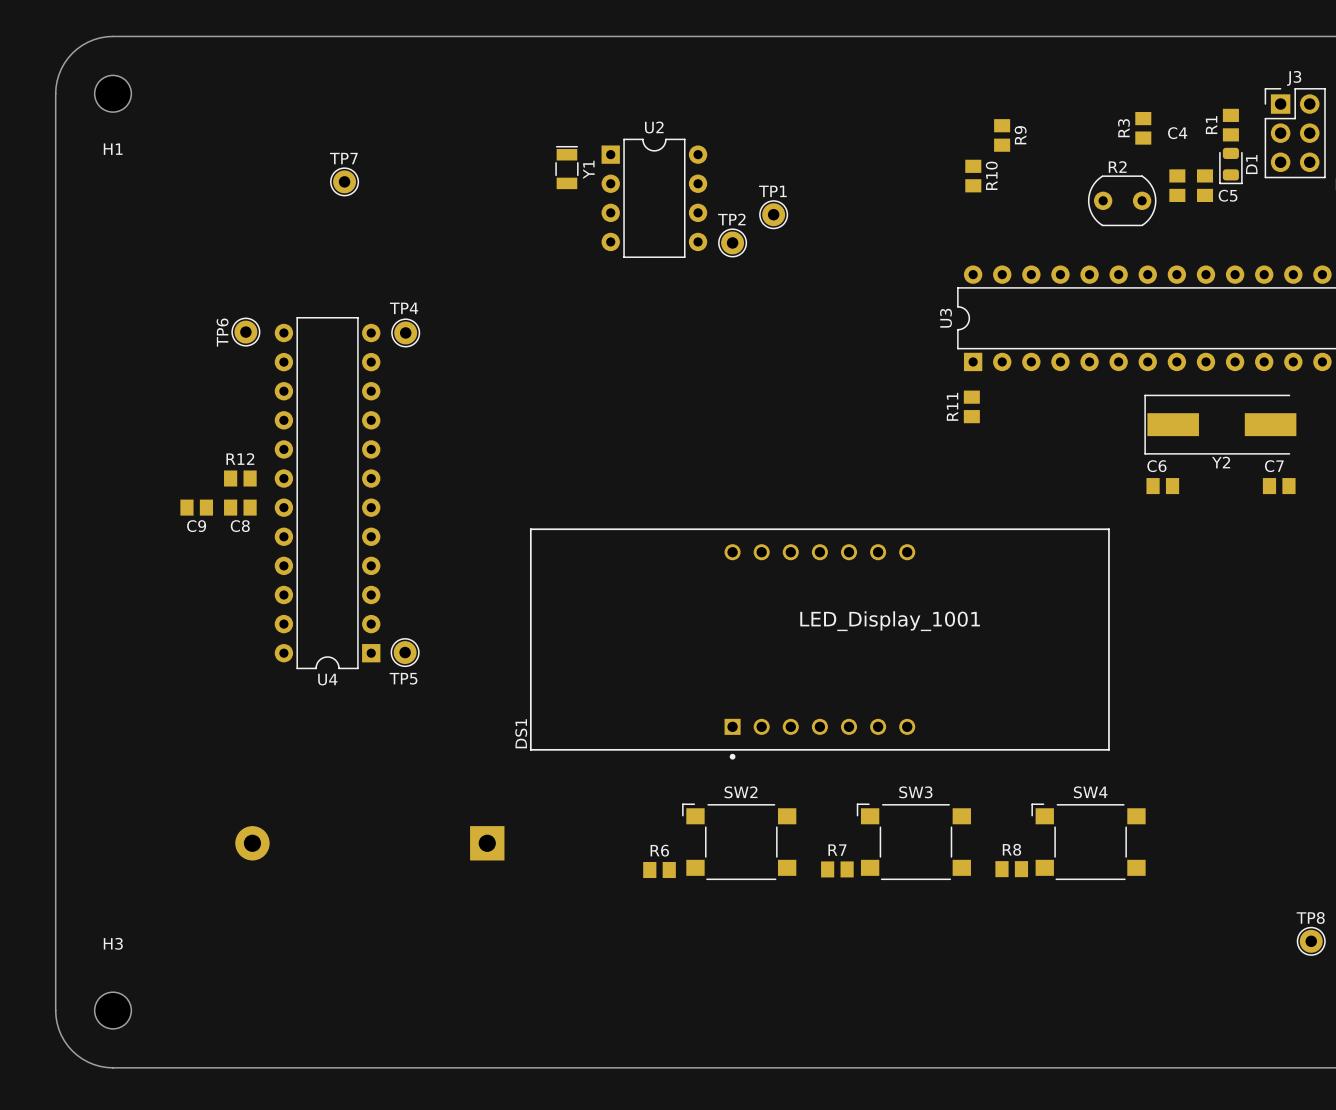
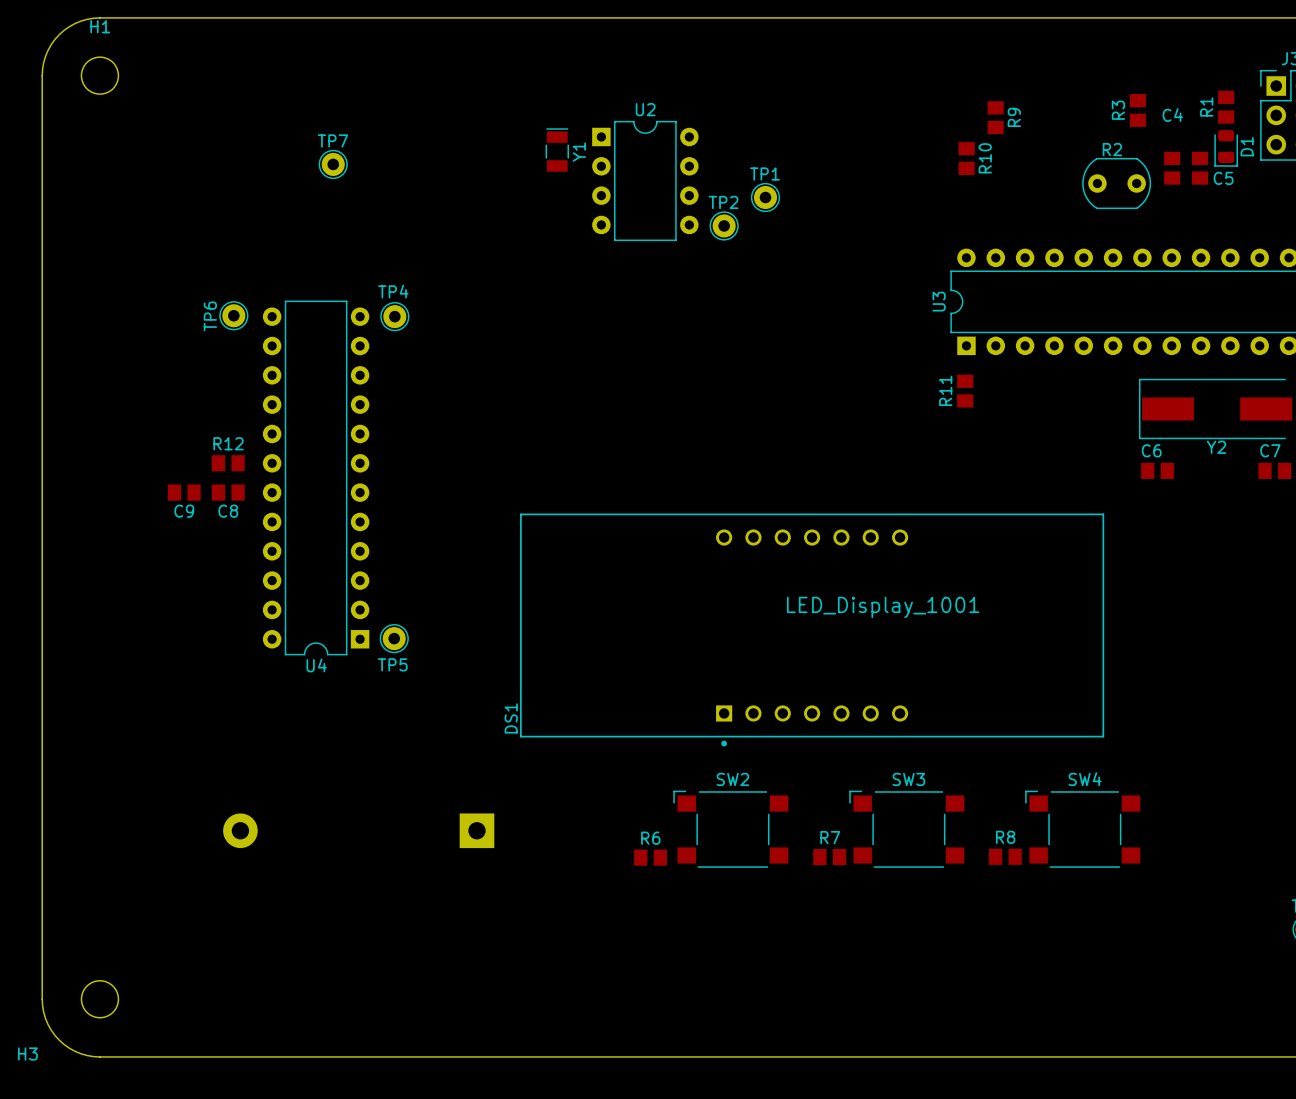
H1 name position: H1 (113, 149) -> H1 (100, 26)
H3 name position: H3 (113, 943) -> H3 (27, 1054)

